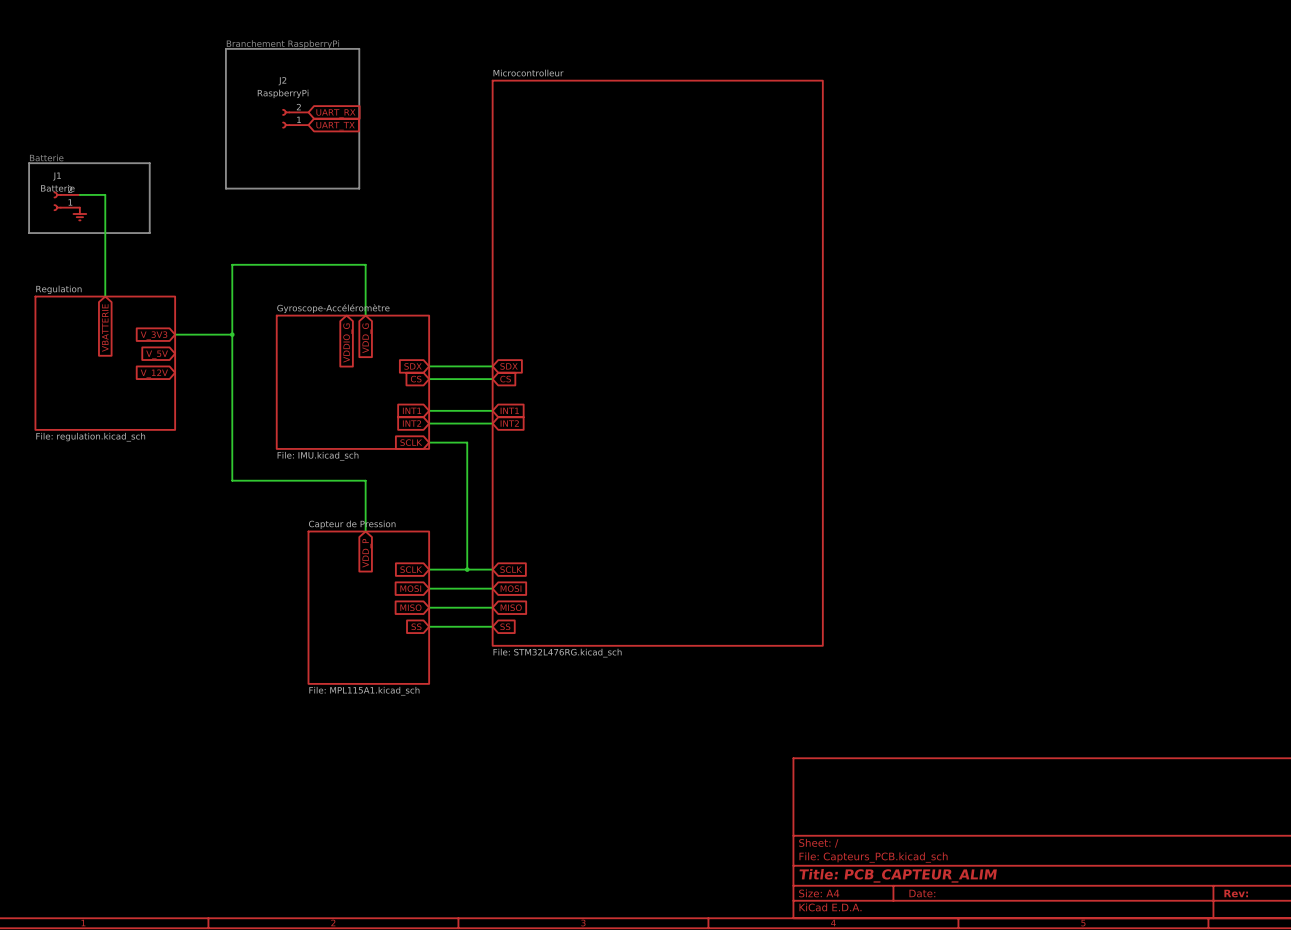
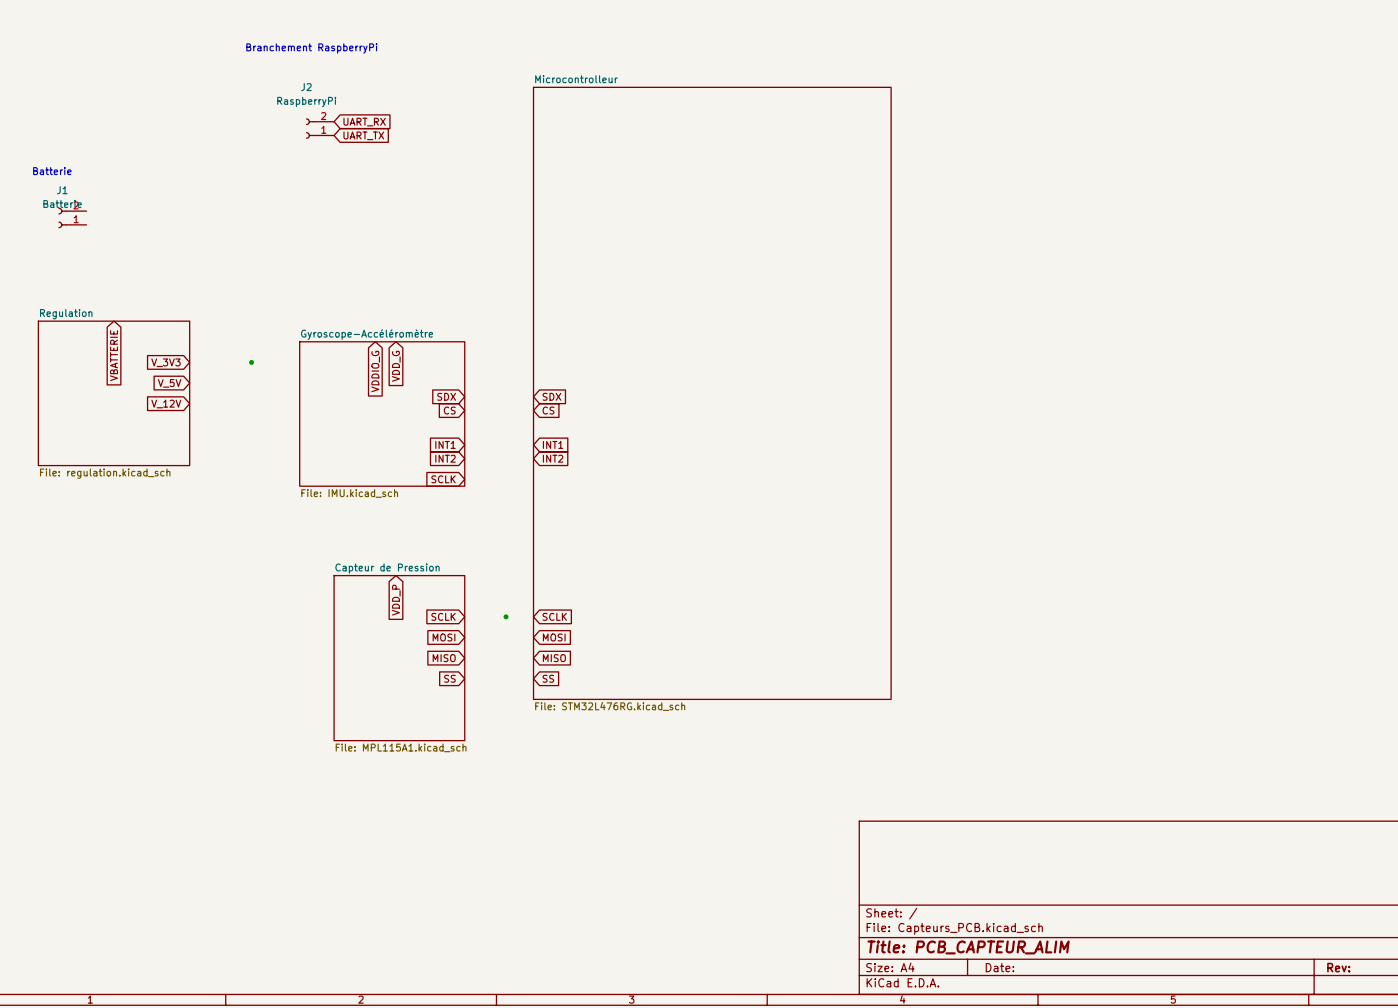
line: (225, 48) (359, 48) (359, 188) (225, 188) (225, 48) -> none
line: (29, 163) (149, 163) (149, 233) (29, 233) (29, 163) -> none
wire: (79, 194) (105, 194) (105, 296) -> none
power symbol: (79, 214) -> none
wire: (365, 315) (365, 264) (232, 264) (232, 480) (365, 480) (365, 531) -> none
wire: (175, 334) (232, 334) -> none
wire: (429, 366) (492, 366) -> none
wire: (429, 379) (492, 379) -> none
wire: (429, 410) (492, 410) -> none
wire: (429, 423) (492, 423) -> none
wire: (429, 442) (467, 442) (467, 569) -> none
wire: (429, 569) (492, 569) -> none
wire: (429, 588) (492, 588) -> none
wire: (429, 607) (492, 607) -> none
wire: (429, 626) (492, 626) -> none

